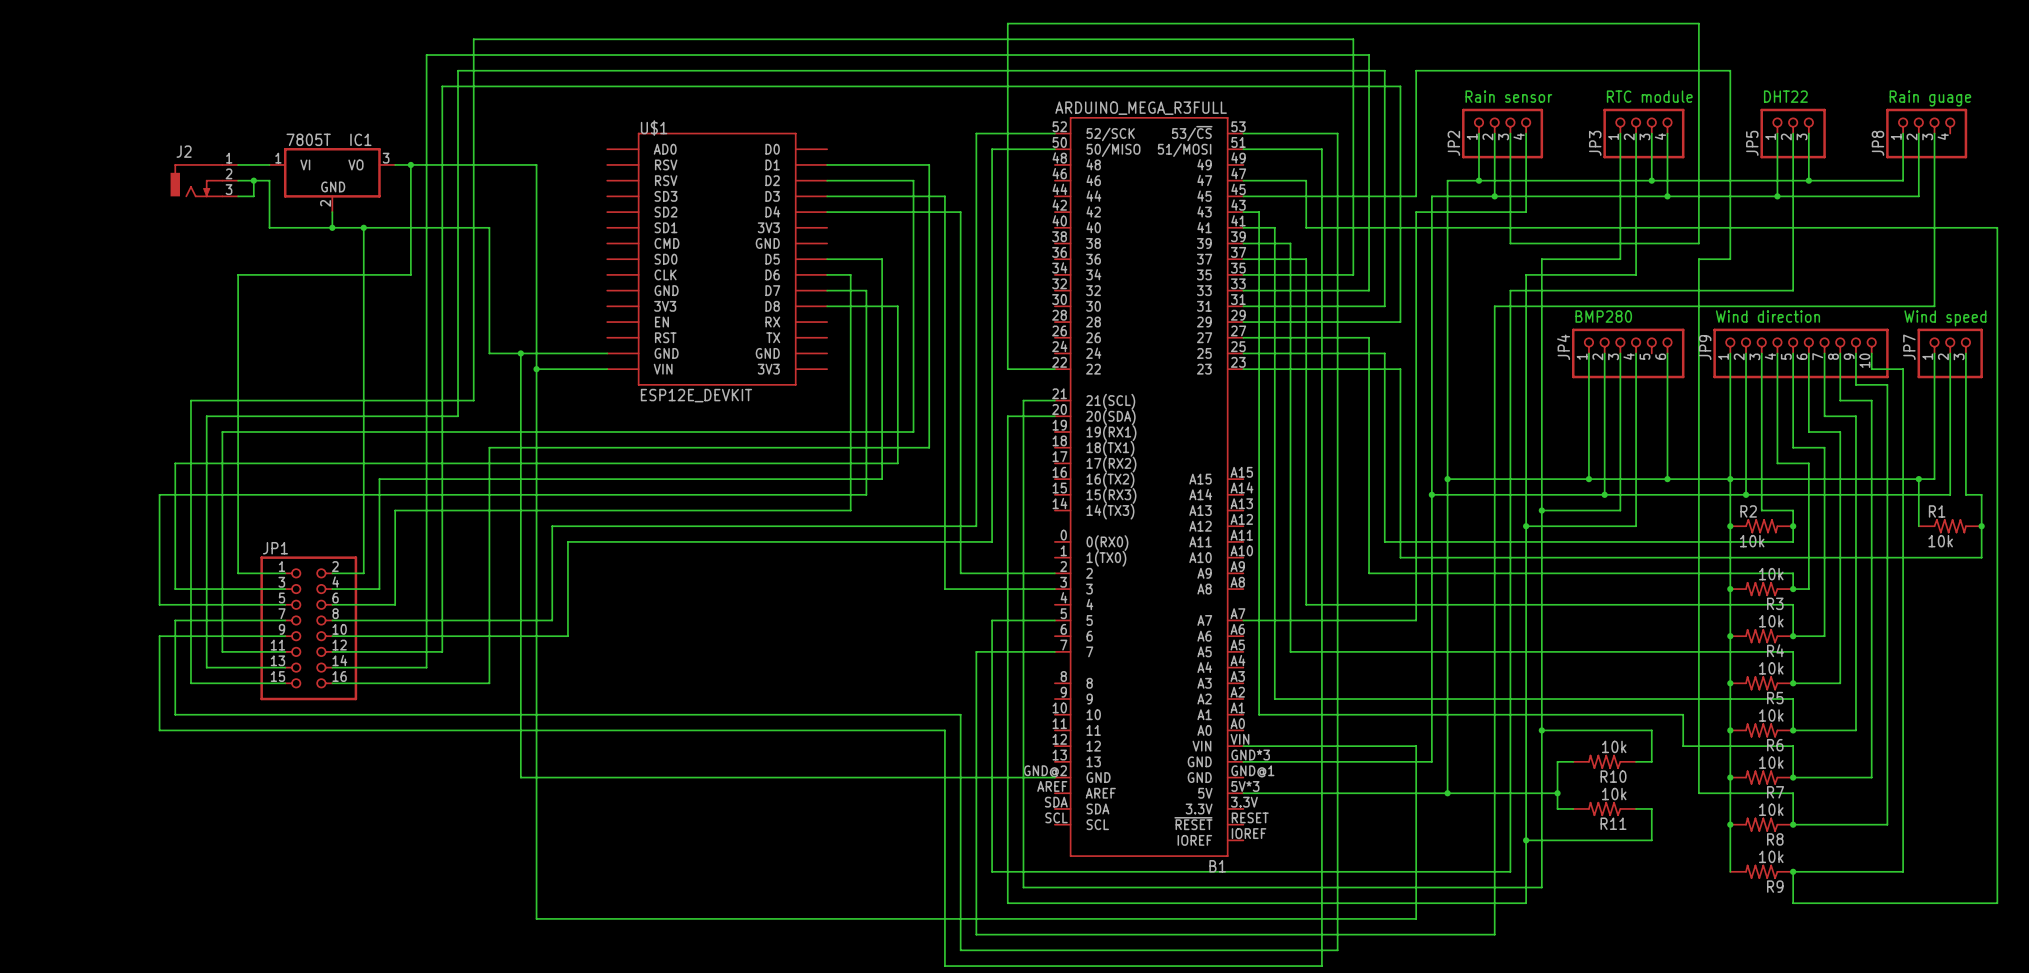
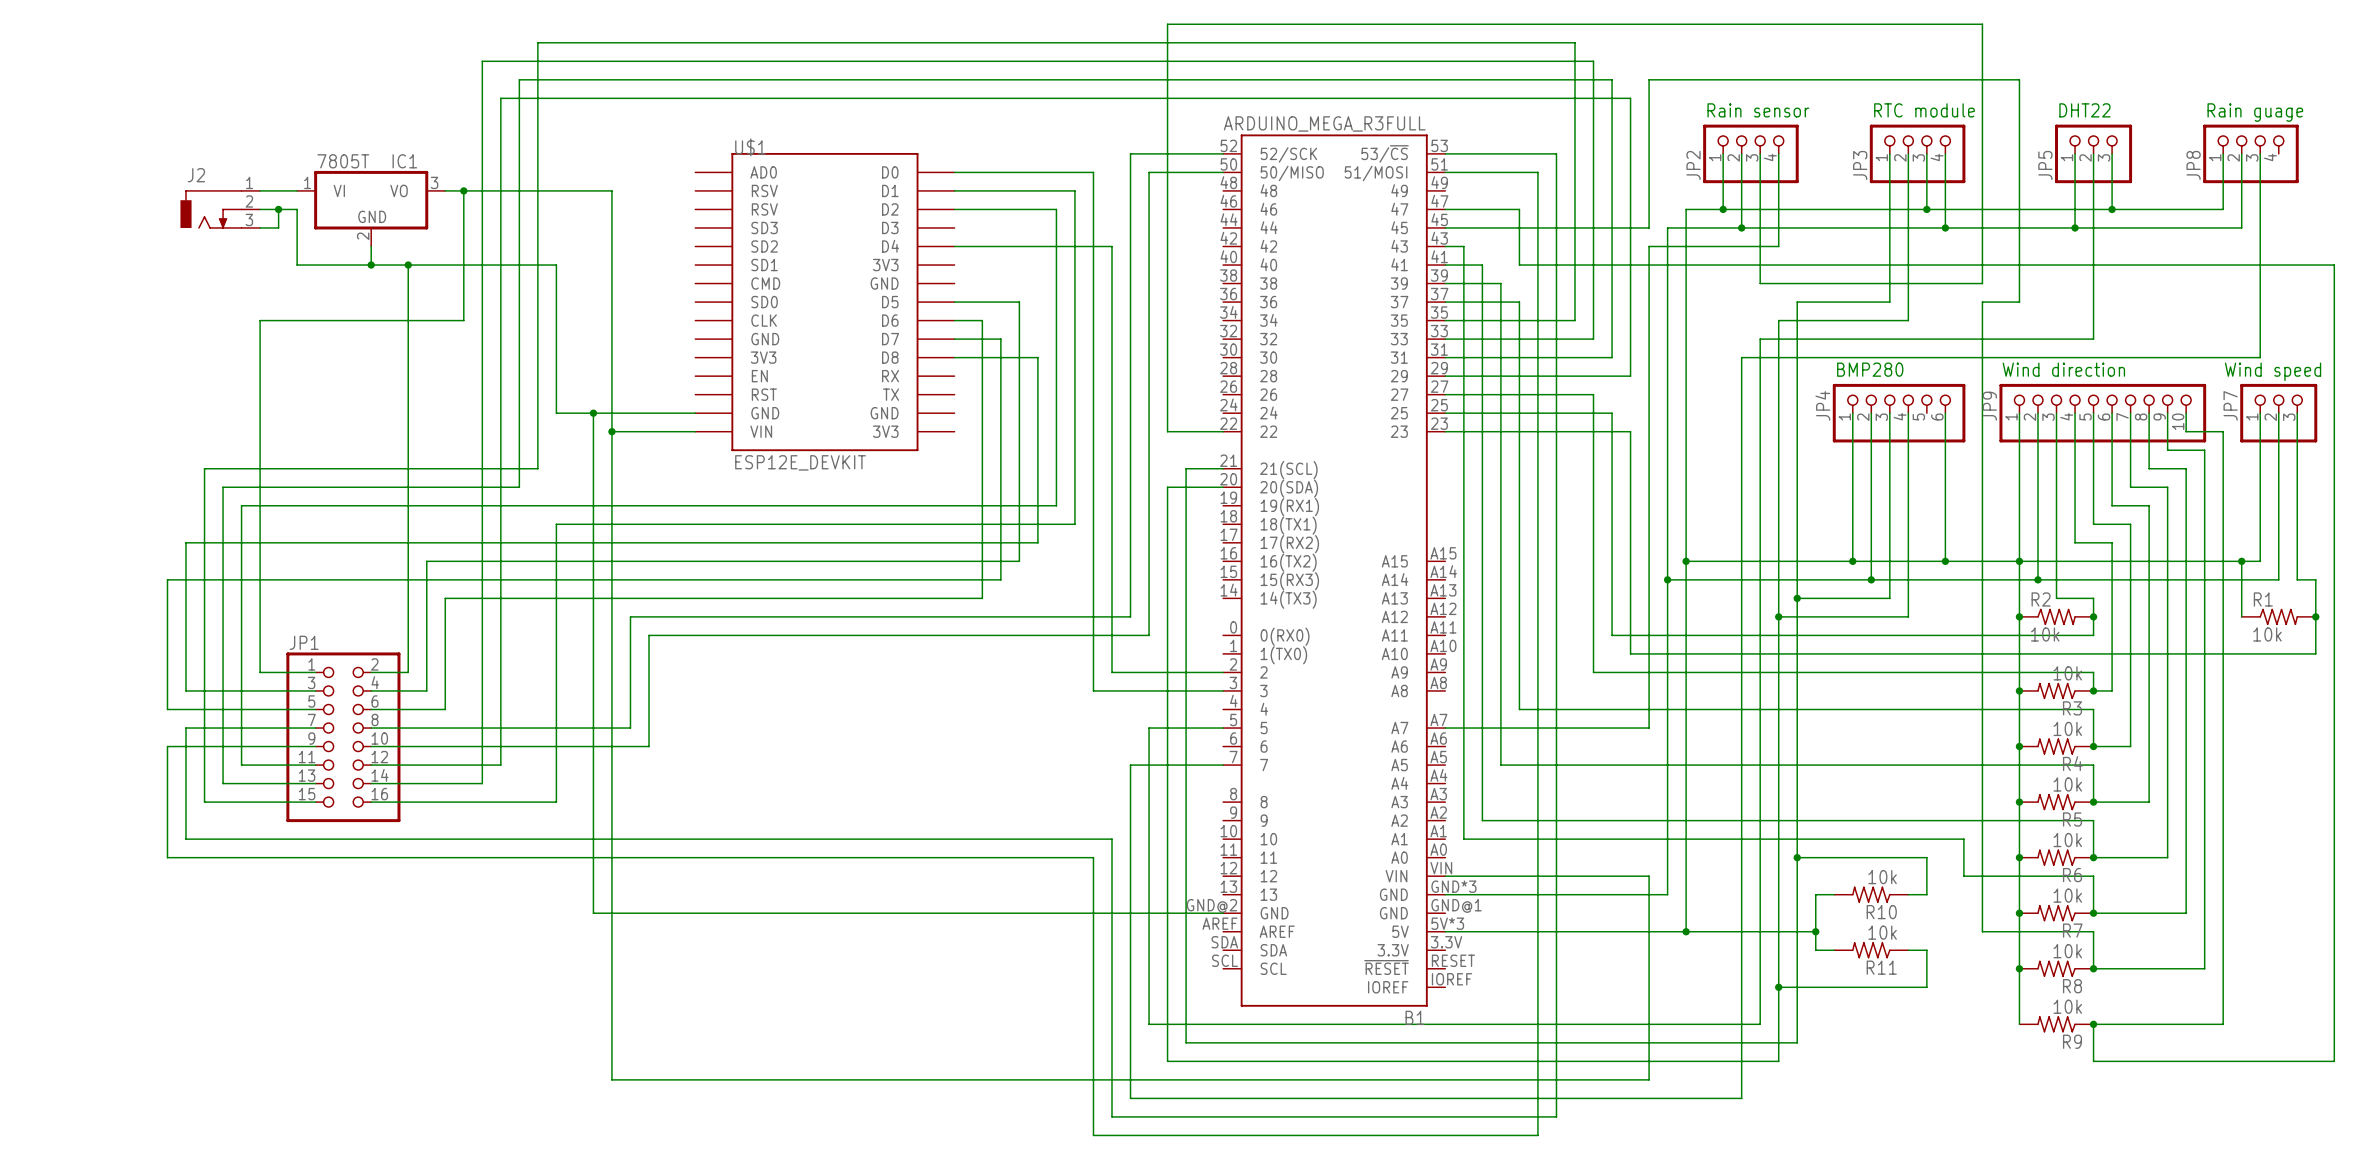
wire: (827, 196) (944, 196) -> (954, 172) (1093, 172) (1093, 227)

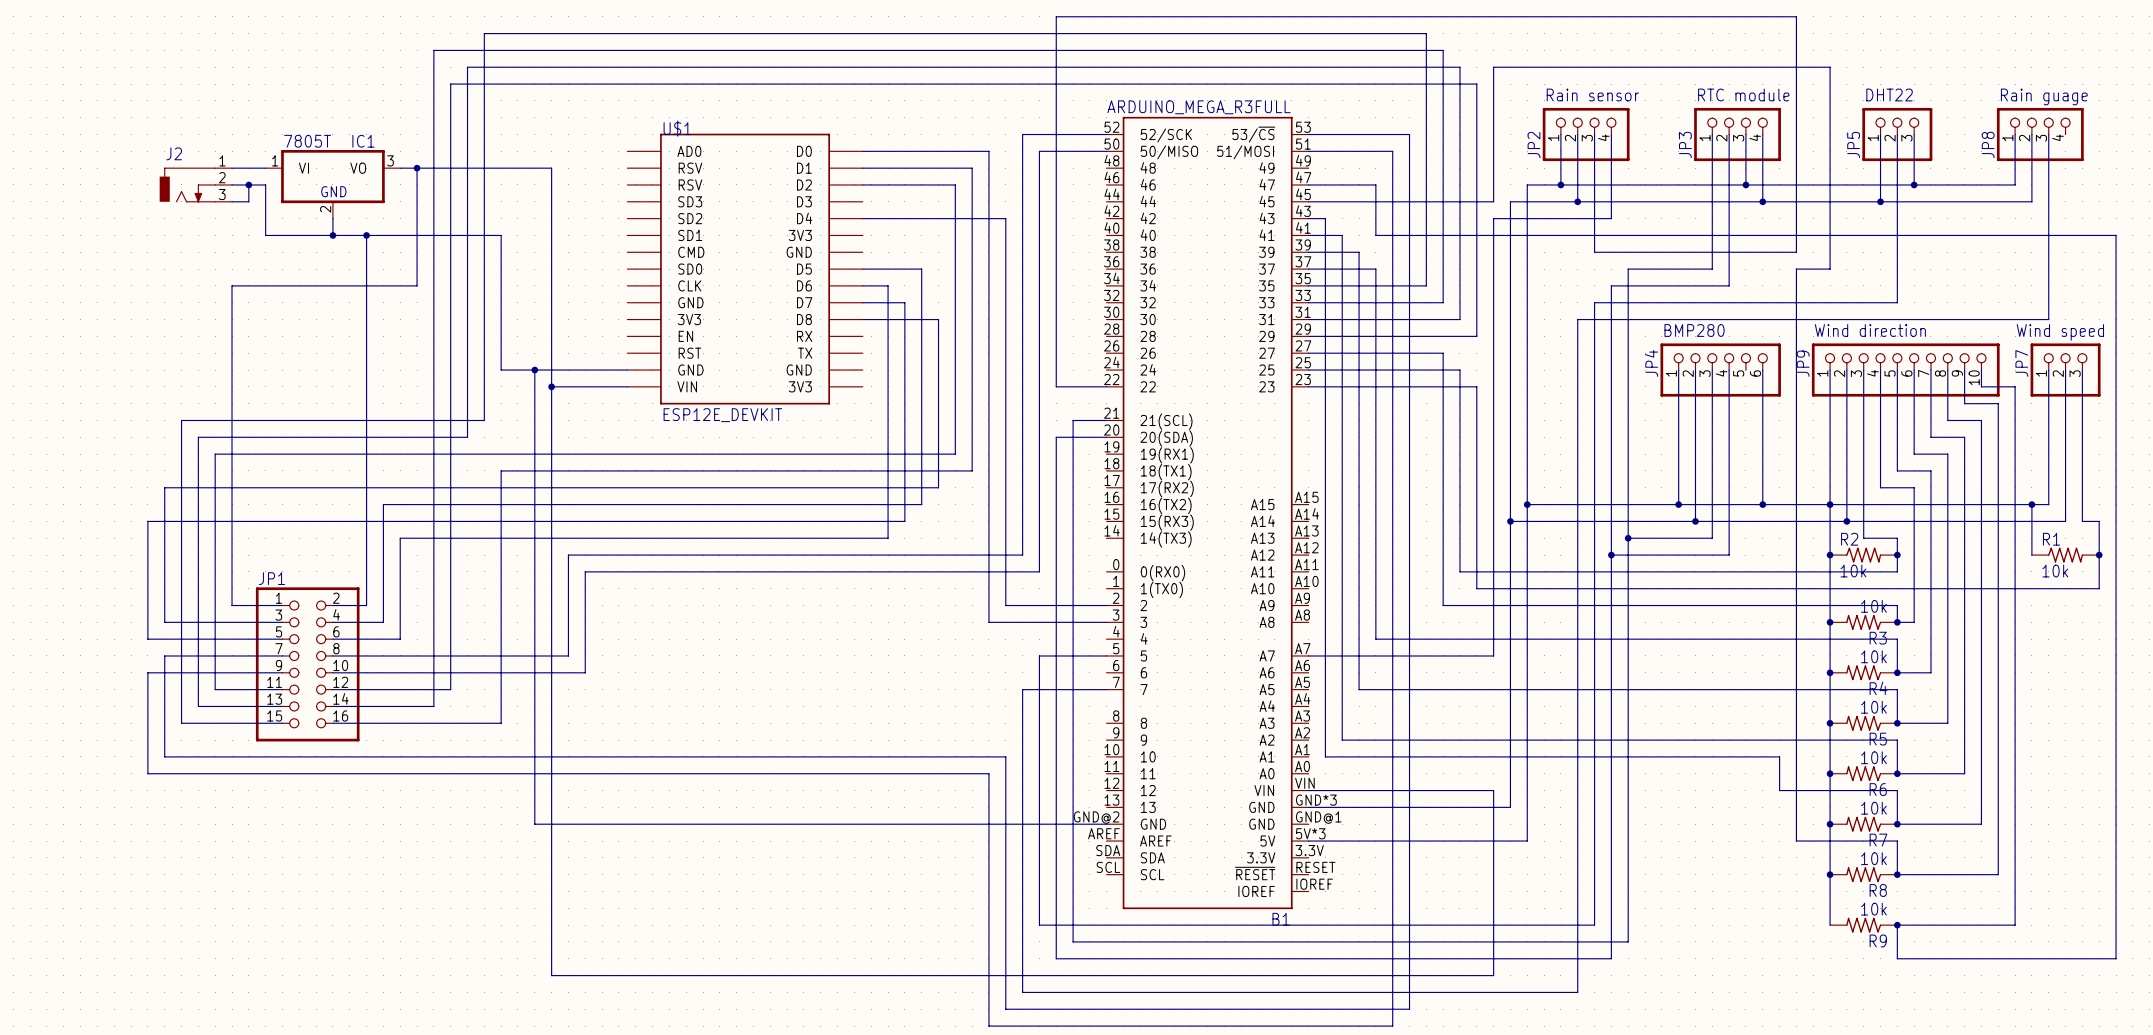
wire: (1797, 857) (1926, 857) (1926, 894) (1908, 894) -> none
junction: (1797, 857) -> none
wire: (1834, 894) (1815, 894) (1815, 950) (1834, 950) -> none
R10: 10k (1871, 894) -> none
wire: (1686, 931) (1815, 931) -> none
junction: (1686, 931) -> none
junction: (1815, 931) -> none
R11: 10k (1871, 950) -> none
wire: (1908, 950) (1926, 950) (1926, 987) (1778, 987) -> none
junction: (1778, 987) -> none

